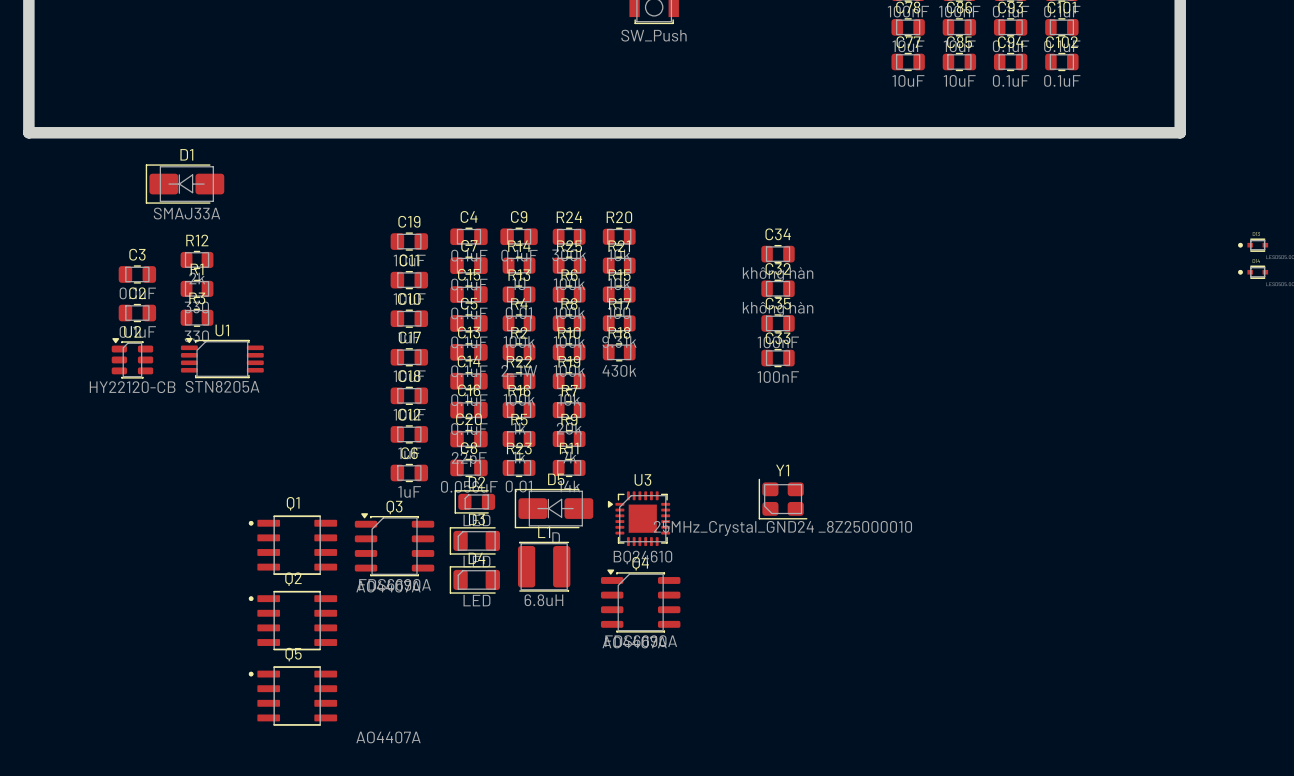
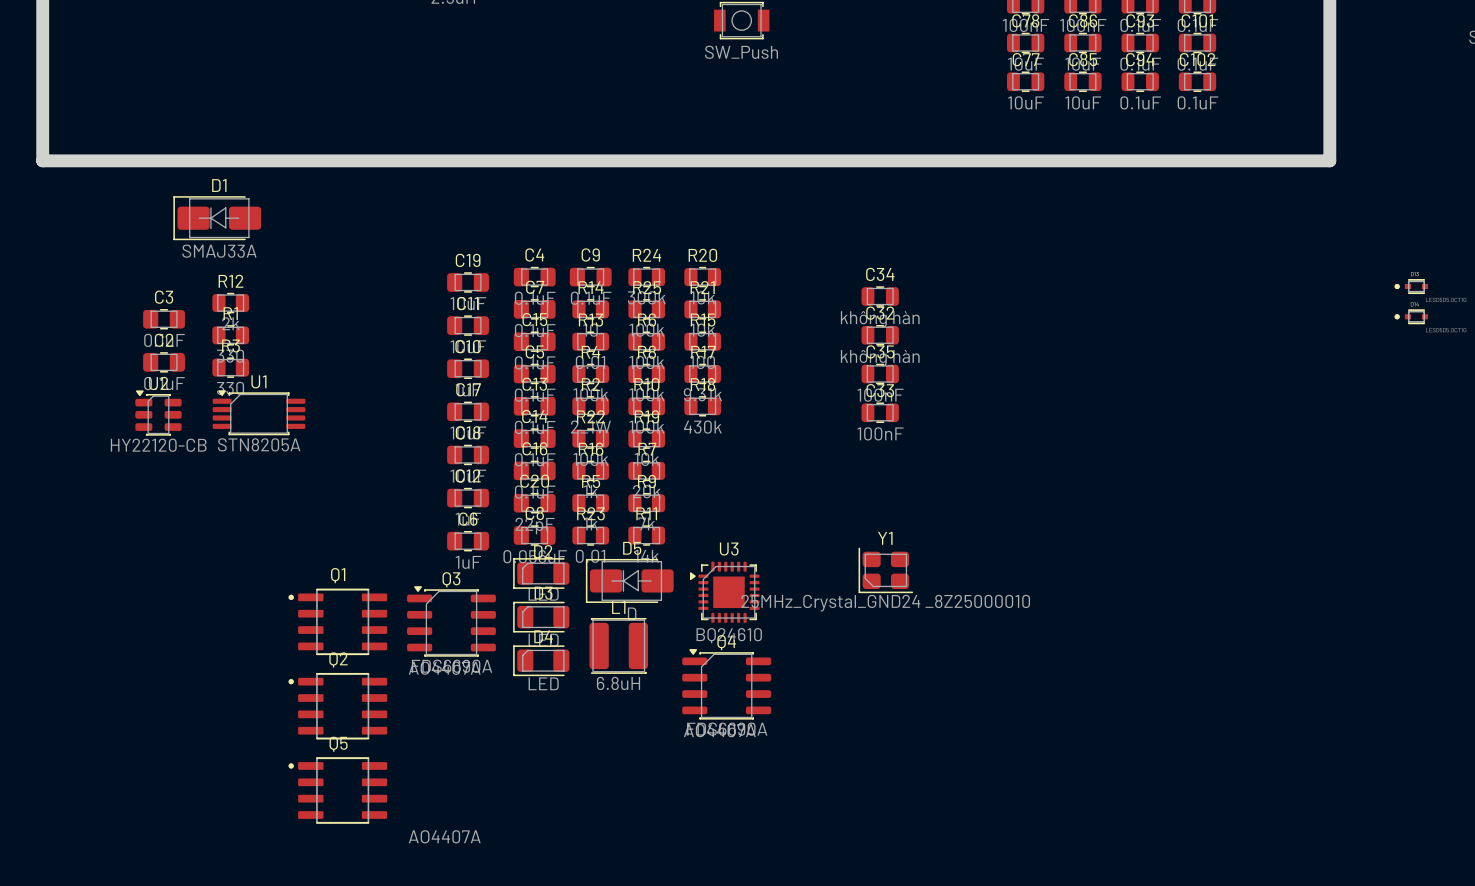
D2 footprint: [454, 490, 496, 514] -> [513, 558, 570, 589]

